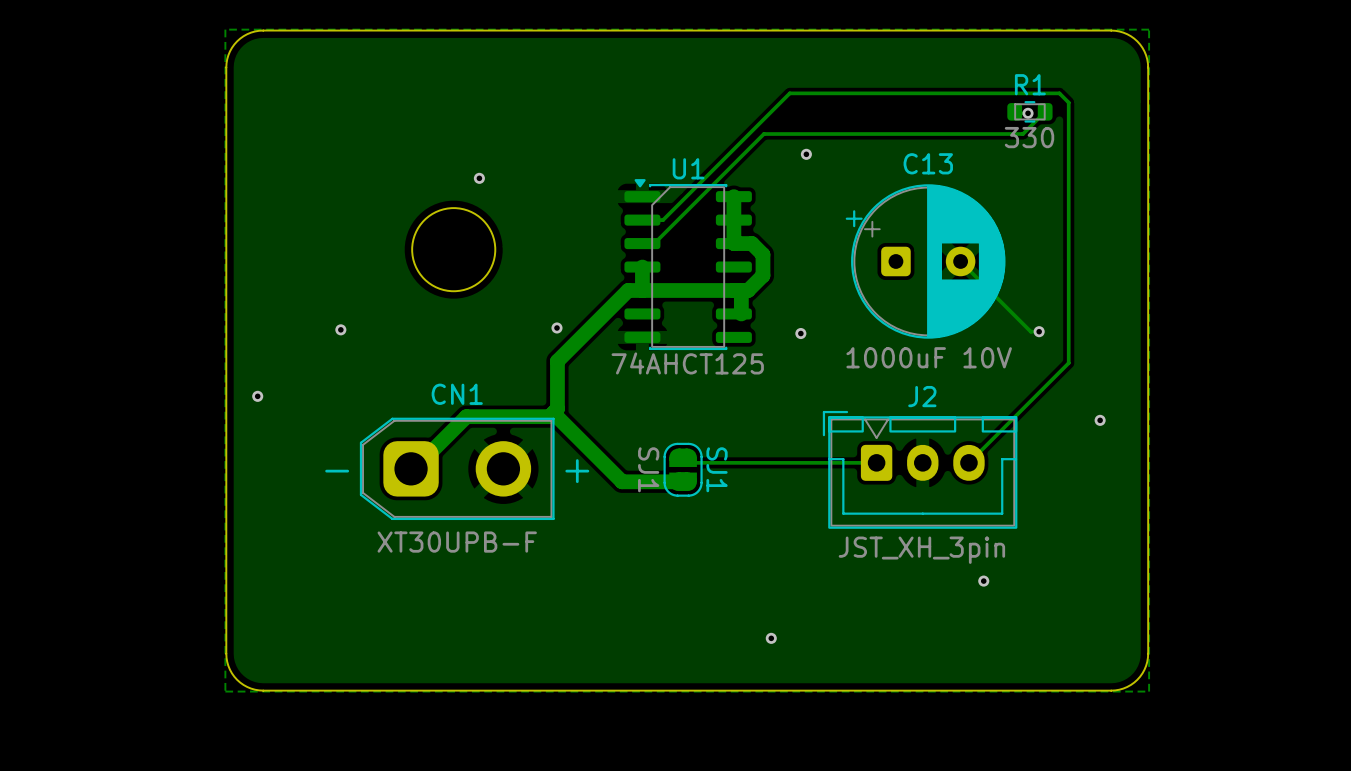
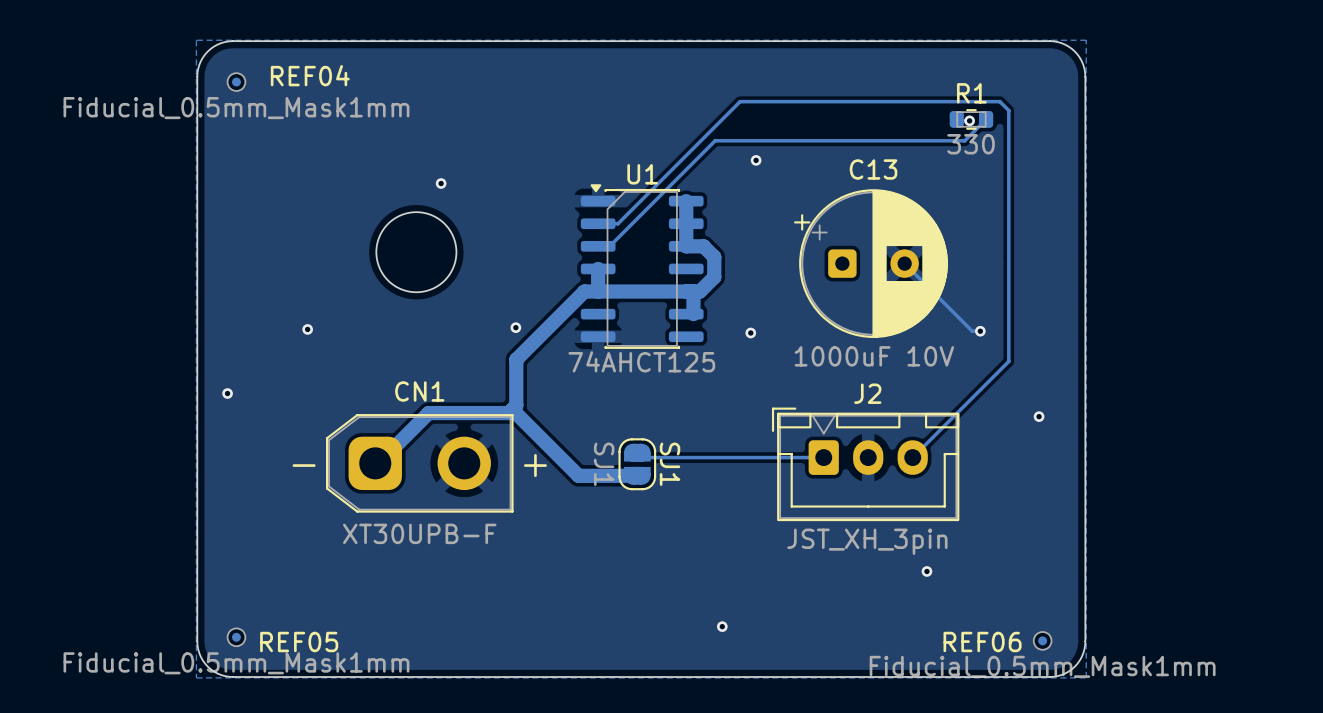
REF04: none -> Fiducial_0.5mm_Mask1mm (236, 82)
REF05: none -> Fiducial_0.5mm_Mask1mm (236, 637)
REF06: none -> Fiducial_0.5mm_Mask1mm (1042, 640)

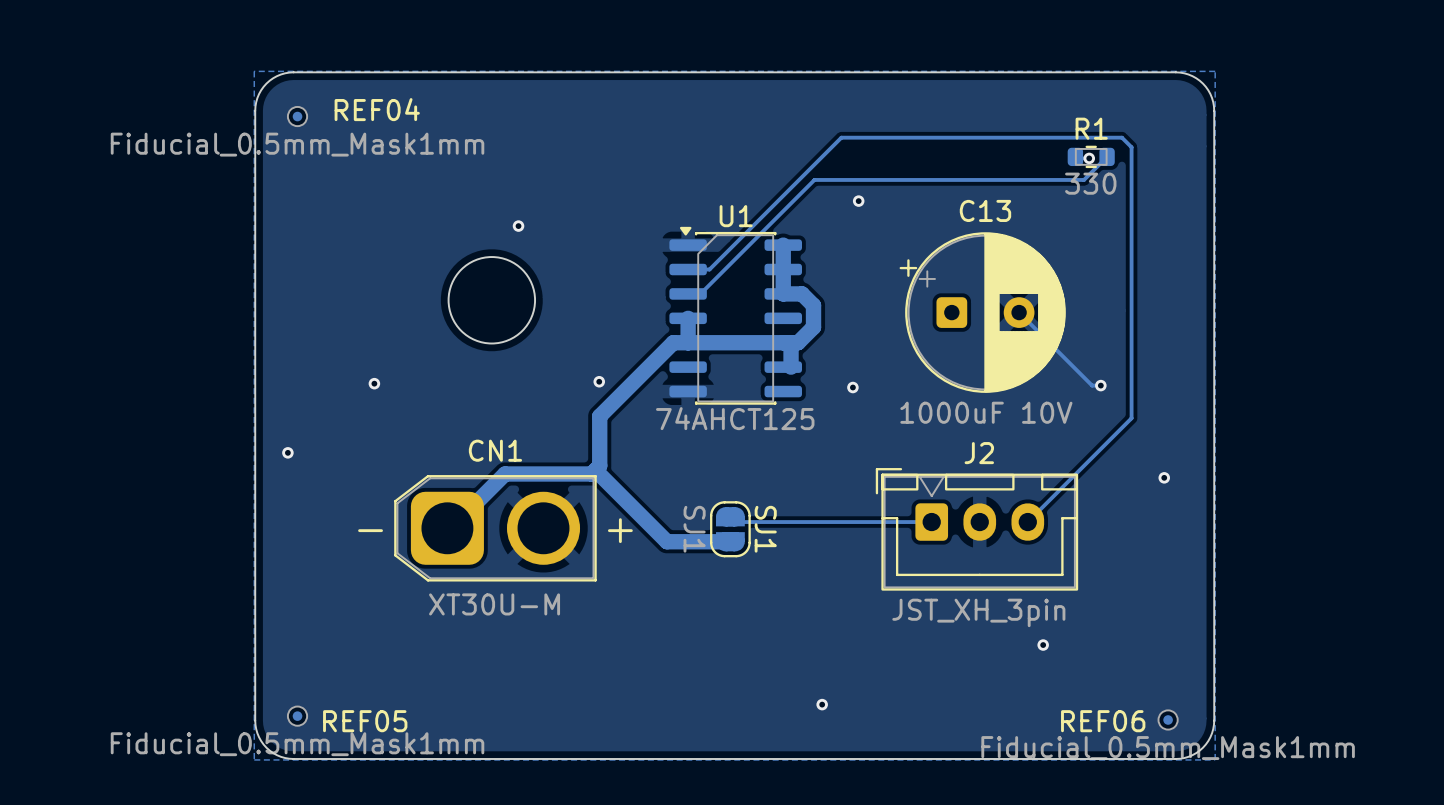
CN1 footprint: [325, 414, 514, 513] -> [394, 475, 597, 582]
CN1 value: XT30UPB-F (419, 533) -> XT30U-M (494, 604)

